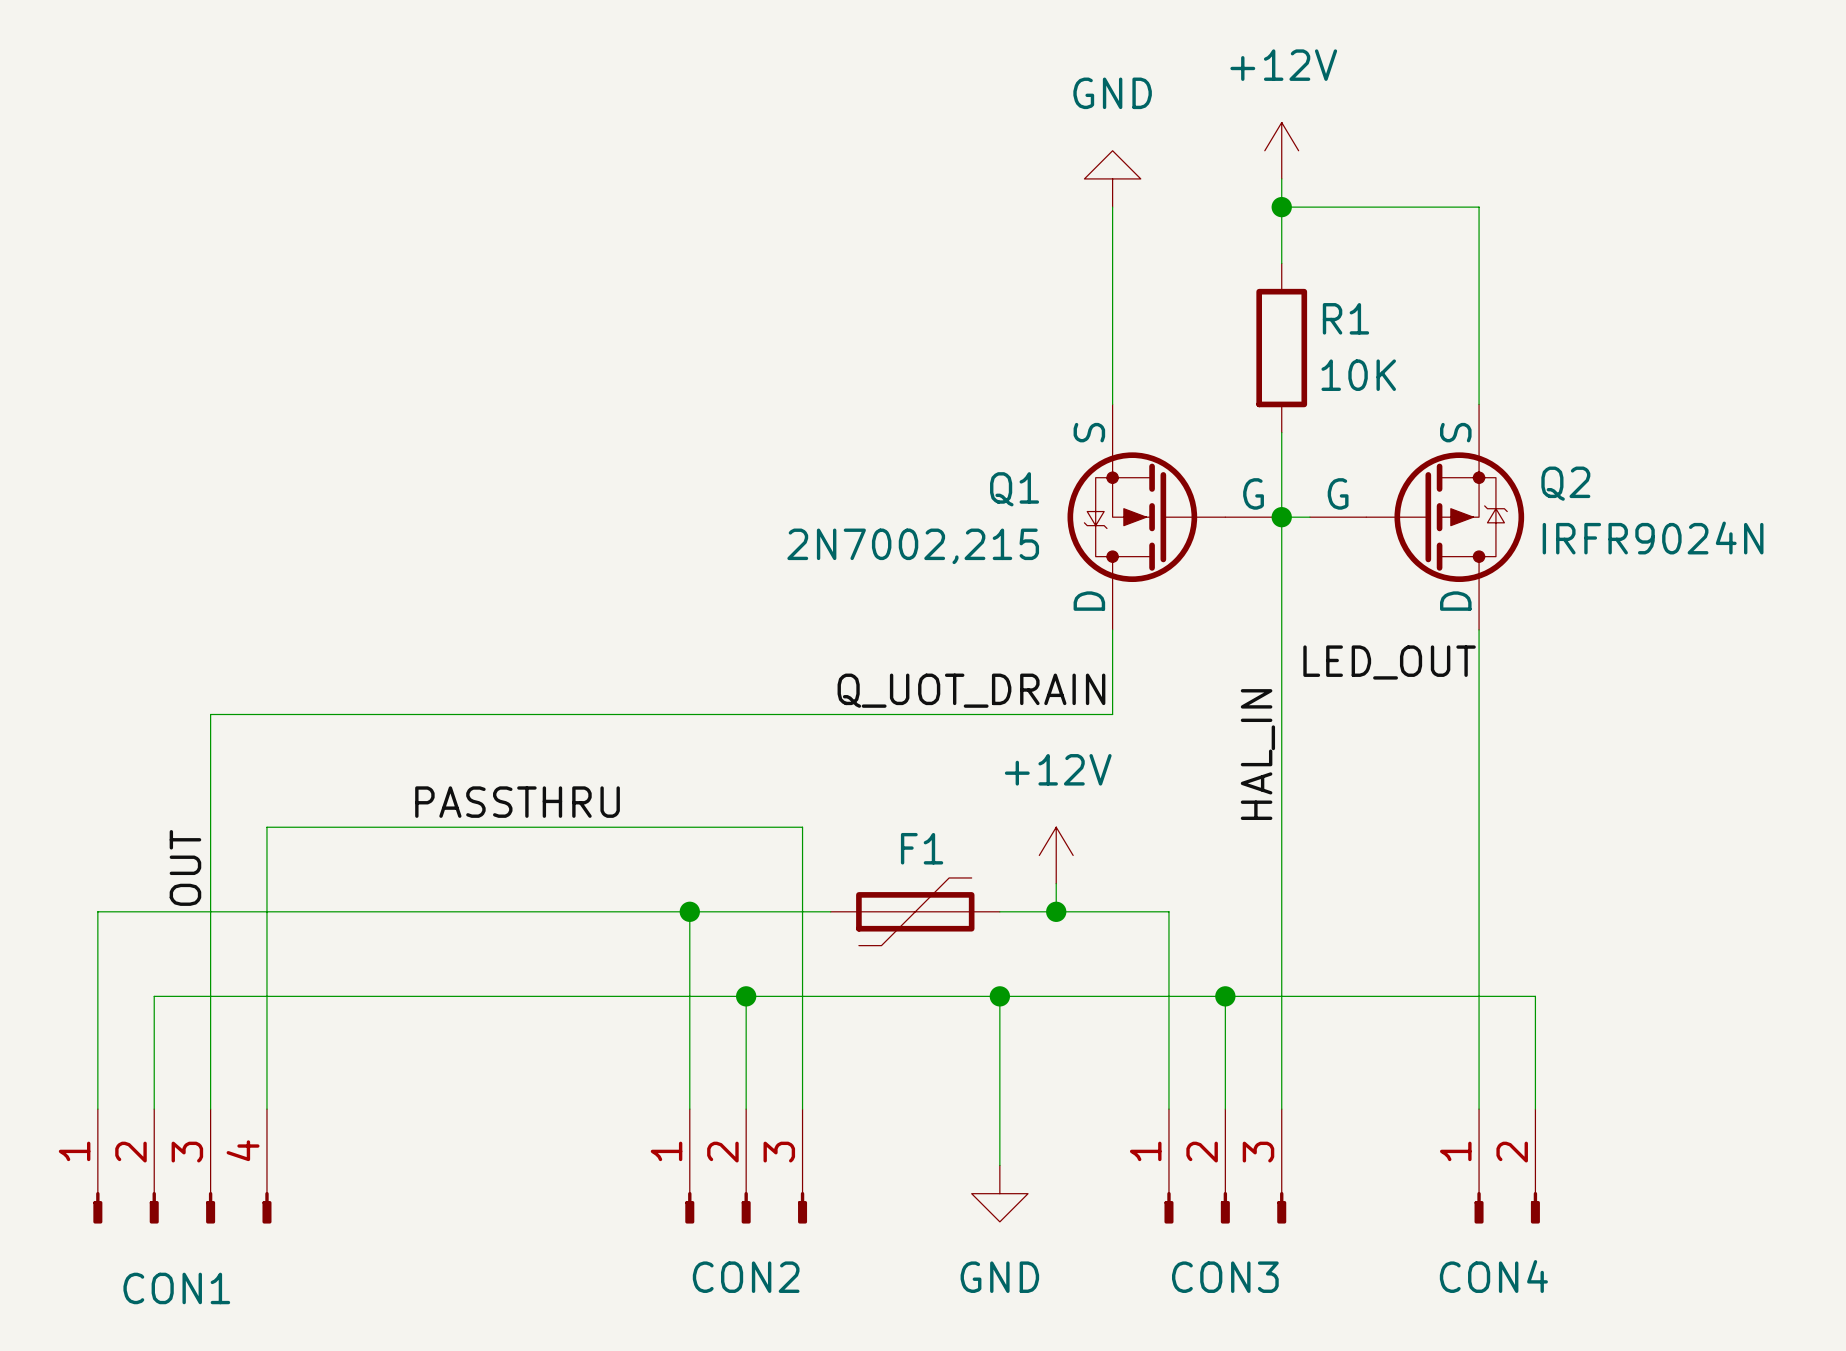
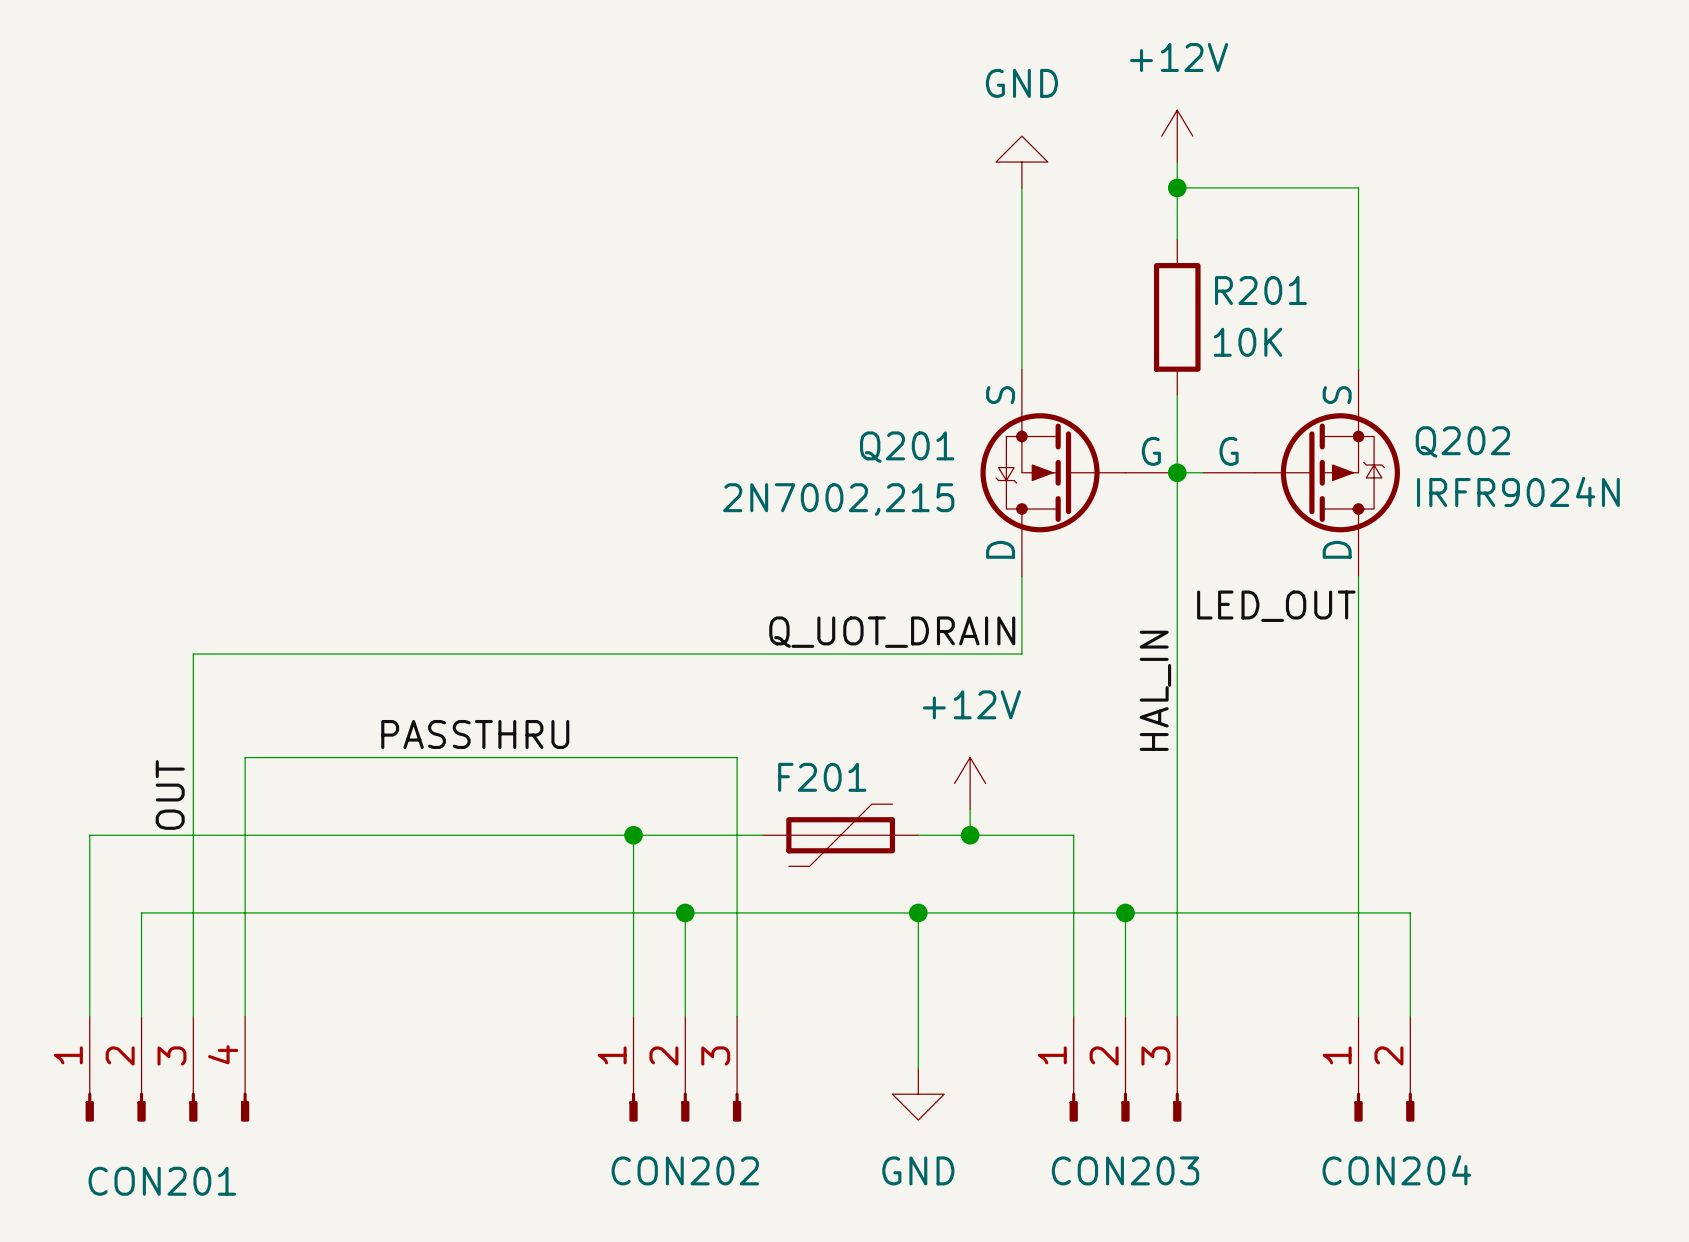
R1 name: R1 (1345, 318) -> R201 (1260, 290)
Q2 name: Q2 (1565, 483) -> Q202 (1462, 441)
Q1 name: Q1 (1014, 489) -> Q201 (907, 447)
F1 name: F1 (922, 848) -> F201 (822, 777)
CON4 name: CON4 (1493, 1276) -> CON204 (1396, 1170)
CON2 name: CON2 (746, 1277) -> CON202 (685, 1170)
CON3 name: CON3 (1225, 1277) -> CON203 (1125, 1170)
CON1 name: CON1 (176, 1288) -> CON201 (162, 1181)

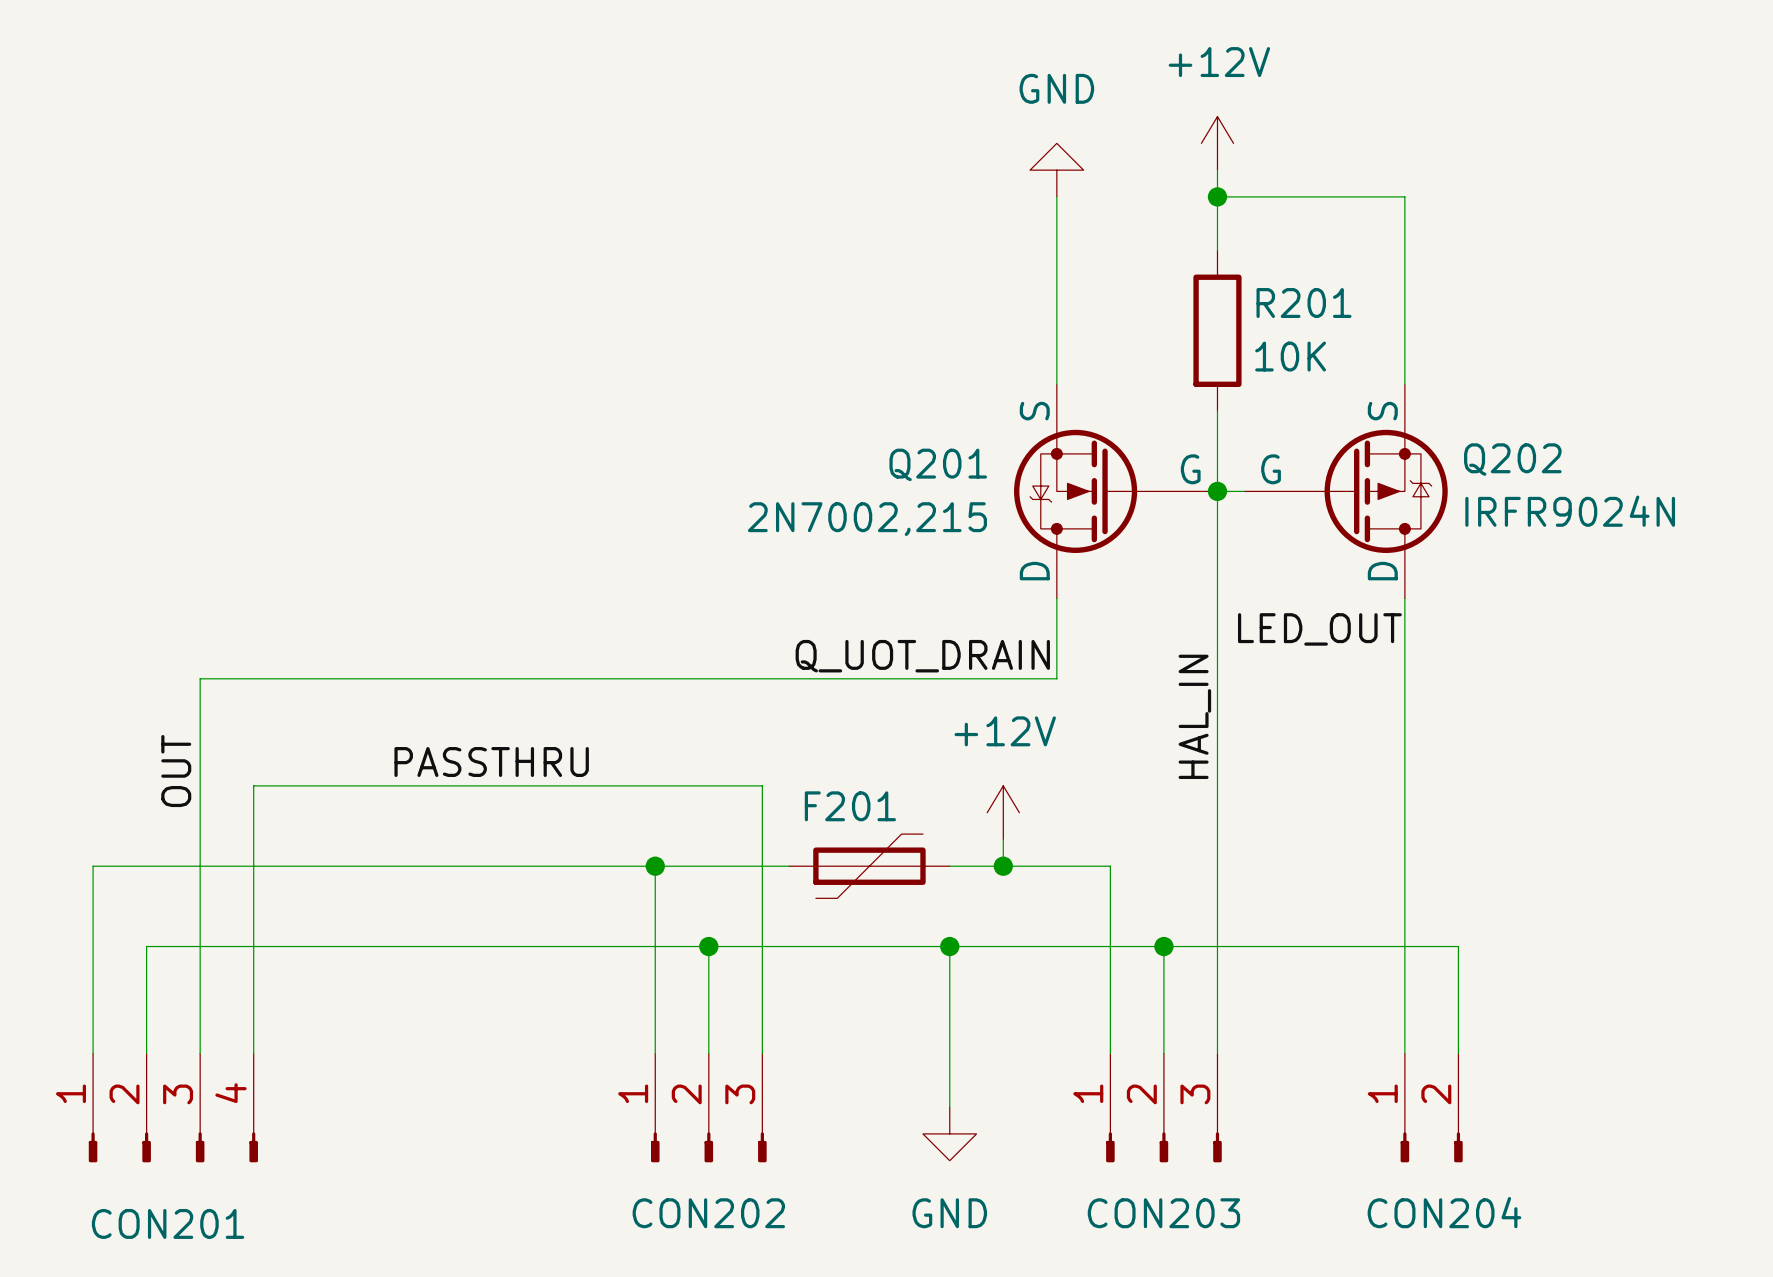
label position: OUT (170, 795) -> OUT (176, 771)

